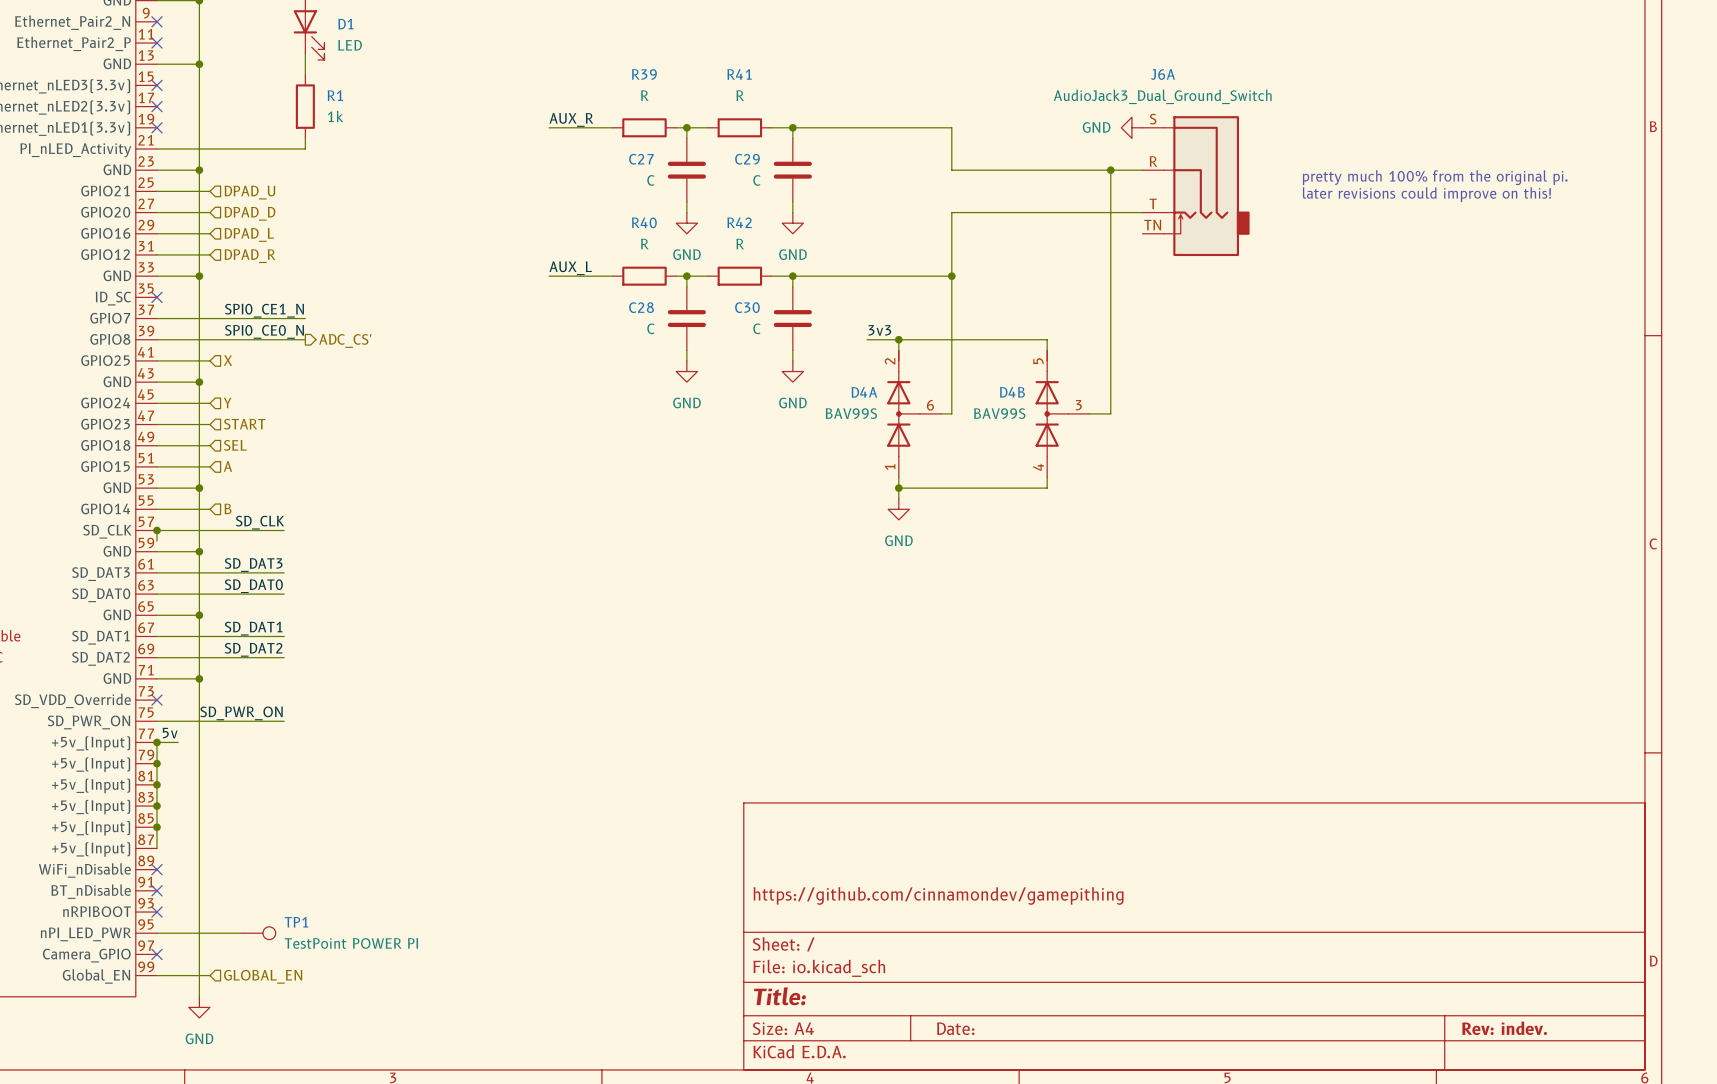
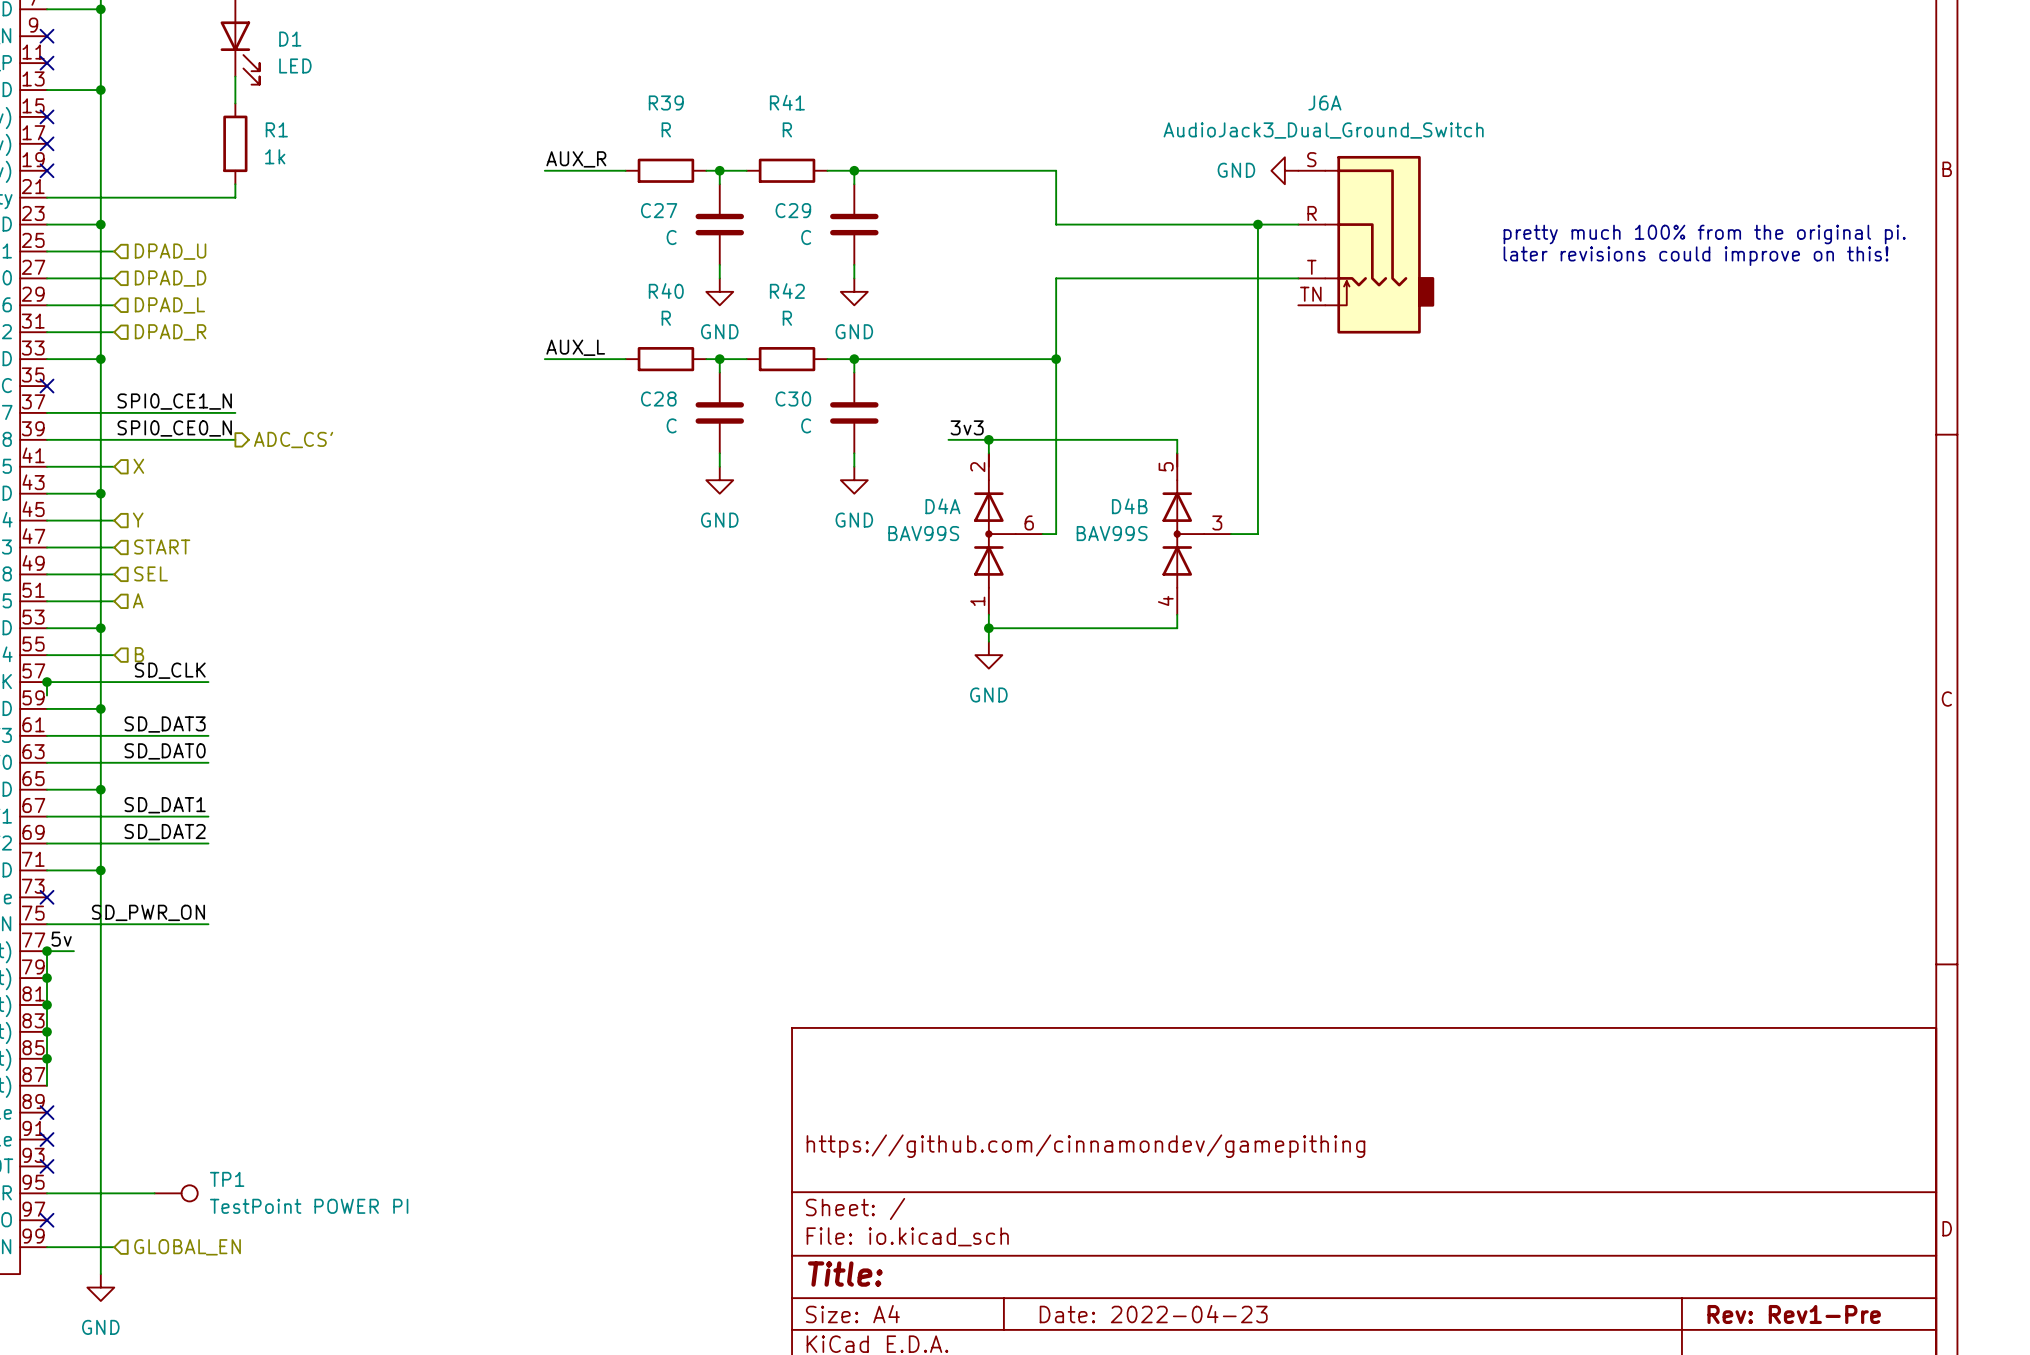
title block: Date: (955, 1028) -> Date: 2022-04-23 (1153, 1314)
title block: Rev: indev. (1504, 1028) -> Rev: Rev1-Pre (1794, 1314)

